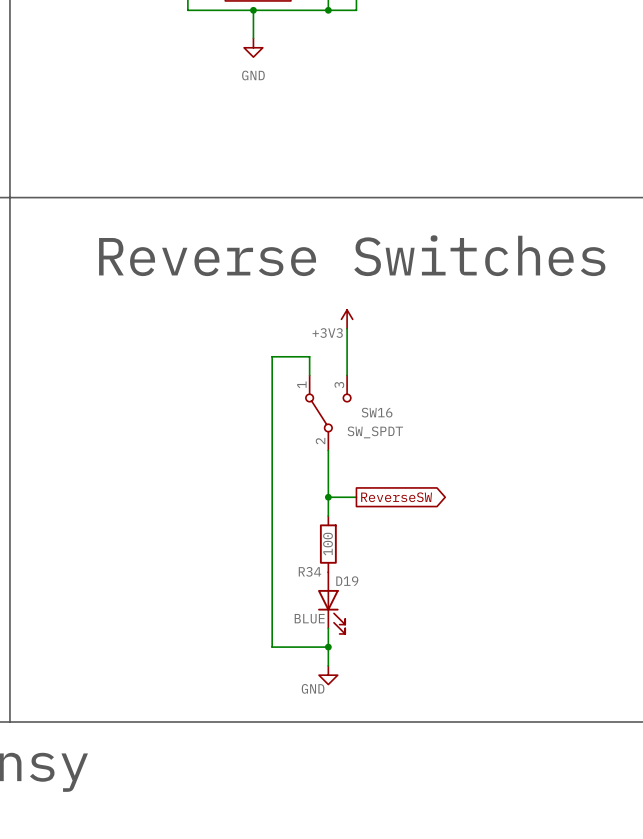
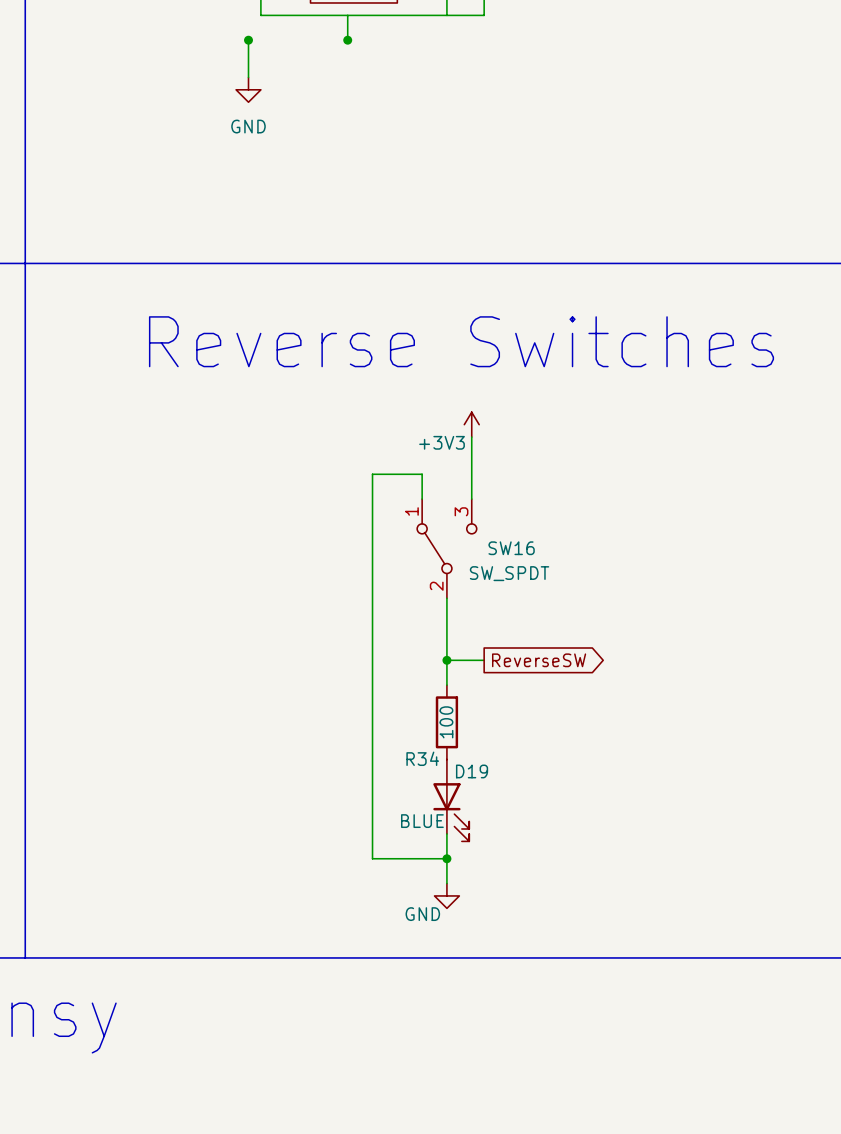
junction position: (253, 10) -> (347, 40)
junction: (328, 10) -> none
wire: none -> (248, 40) (248, 77)
junction: none -> (248, 40)
wire: (253, 29) (253, 38) -> none
power symbol position: GND (253, 47) -> GND (248, 89)

